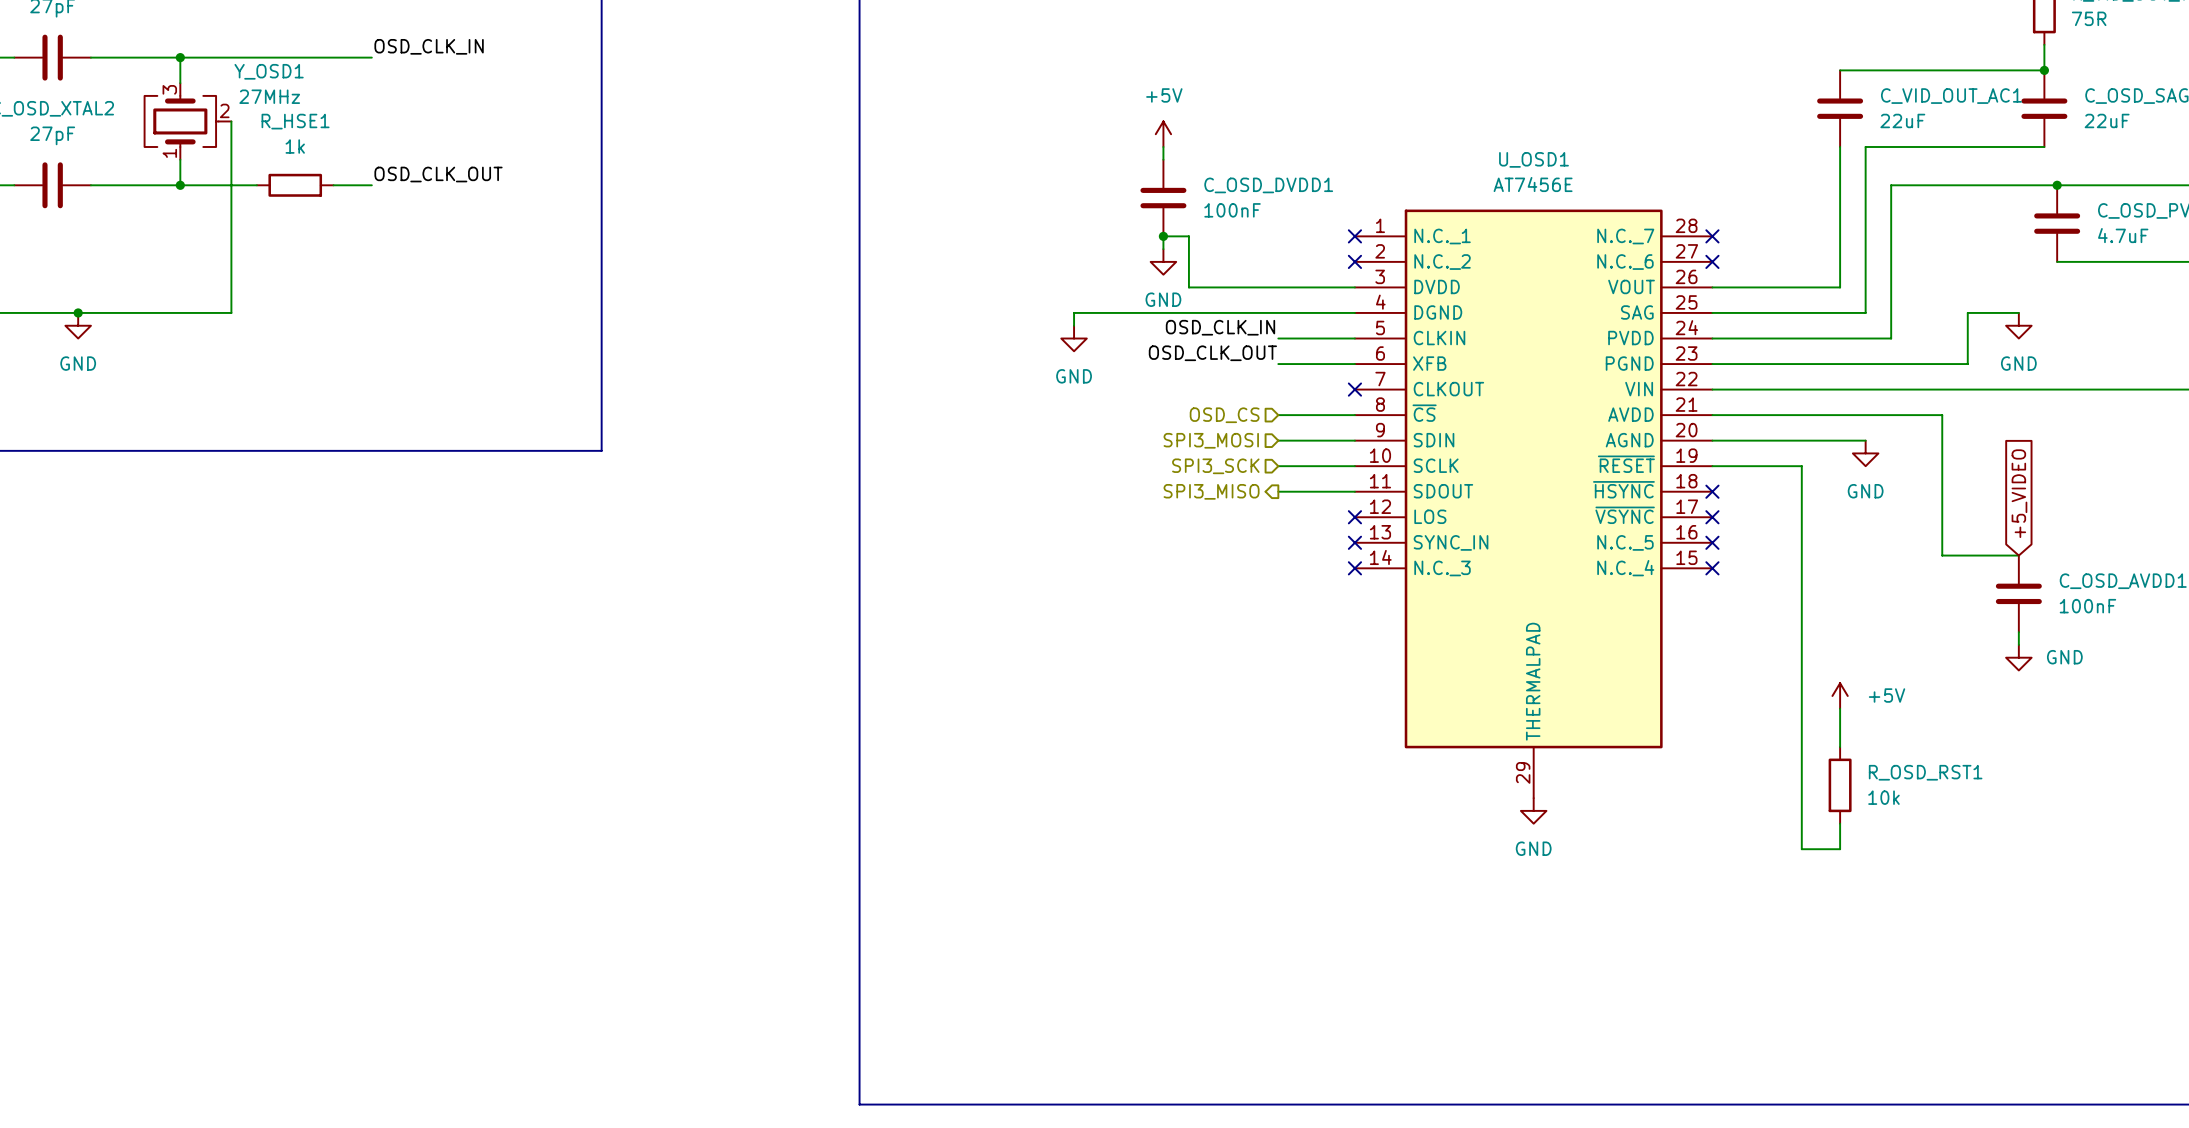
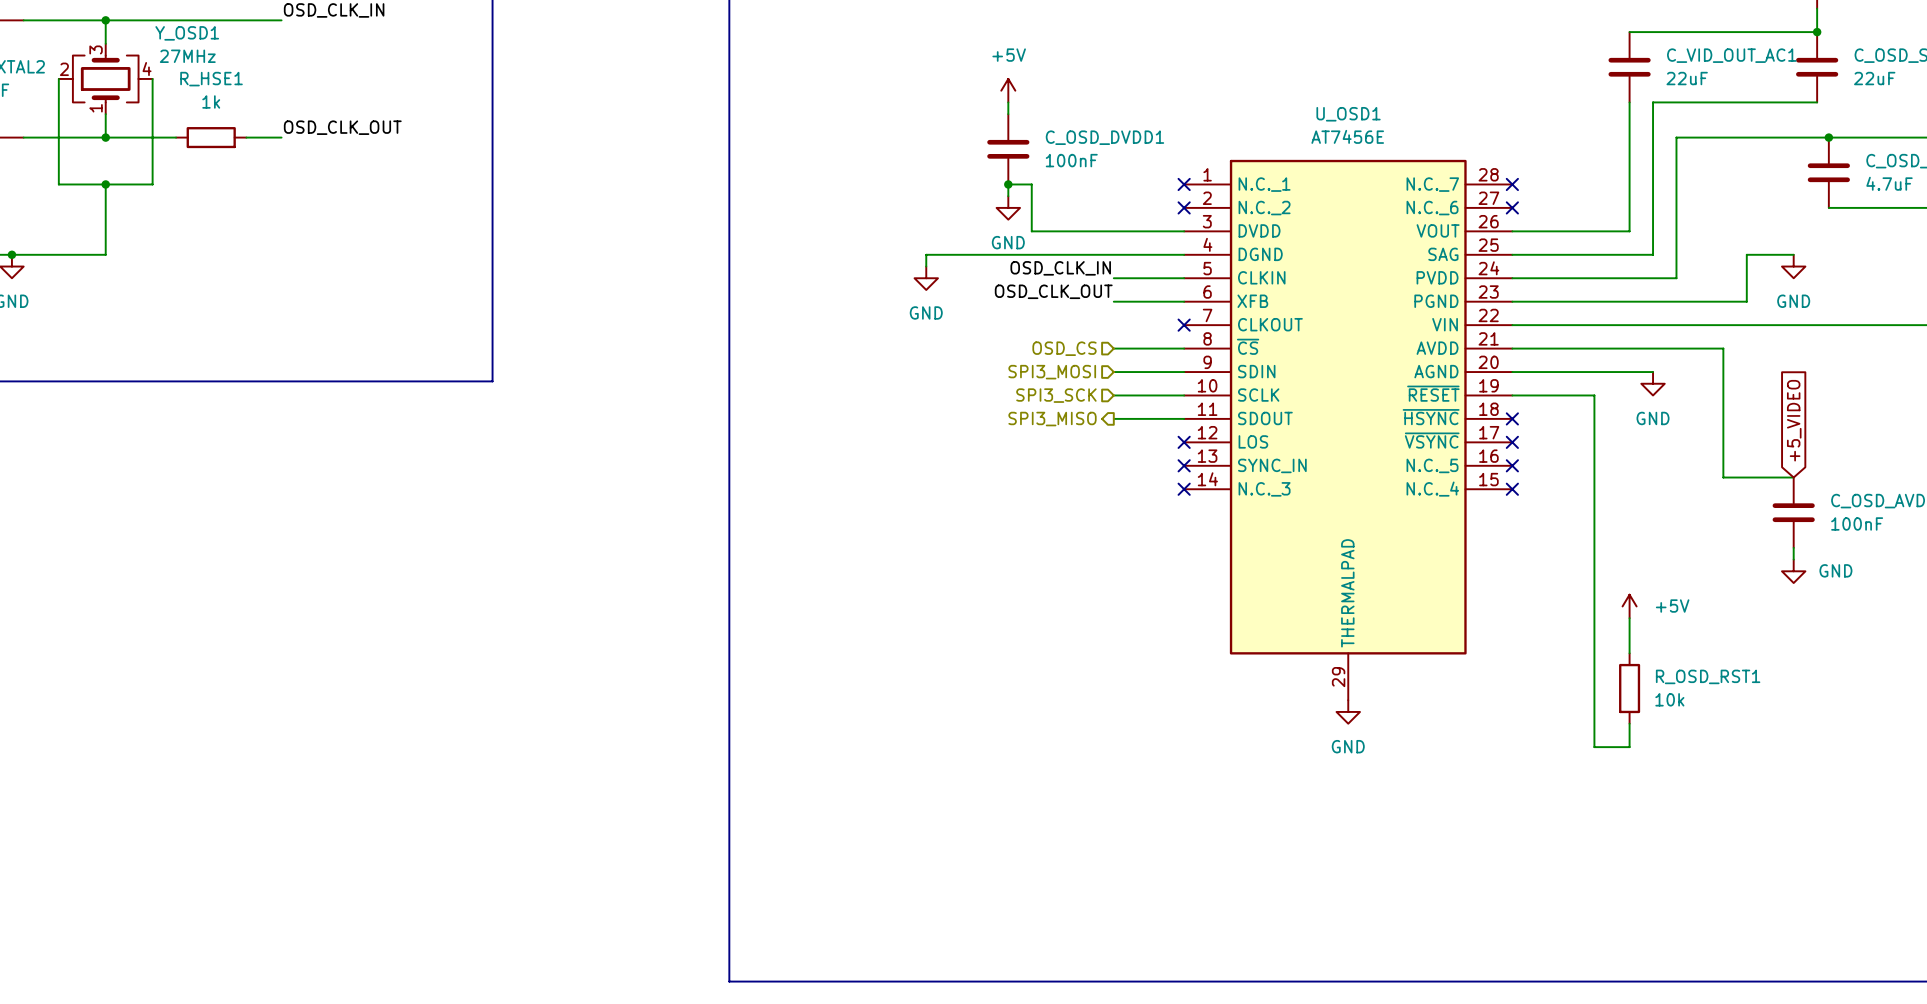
Y_OSD1 symbol: [144, 83, 232, 160] -> [58, 43, 153, 115]
wire: none -> (58, 78) (58, 184) (152, 184)
junction: none -> (105, 184)
wire: (231, 236) (231, 312) (180, 312) -> (105, 184) (105, 254)

